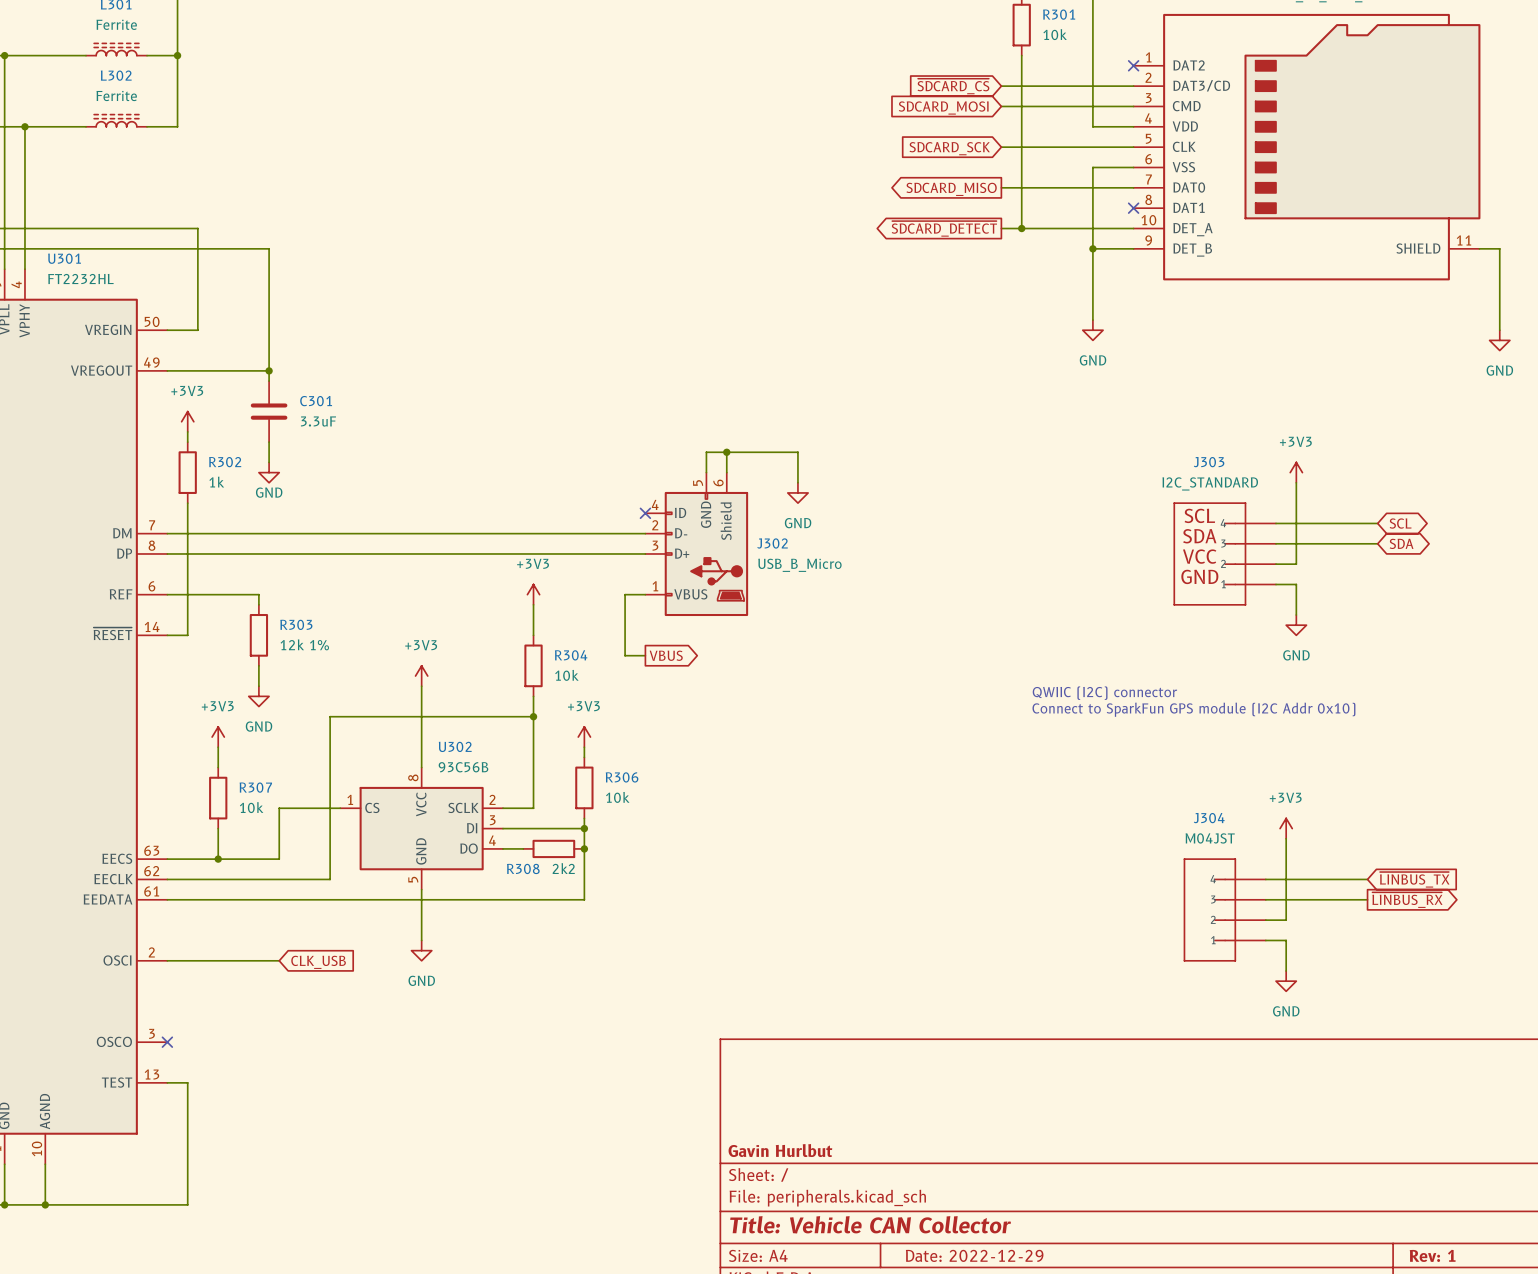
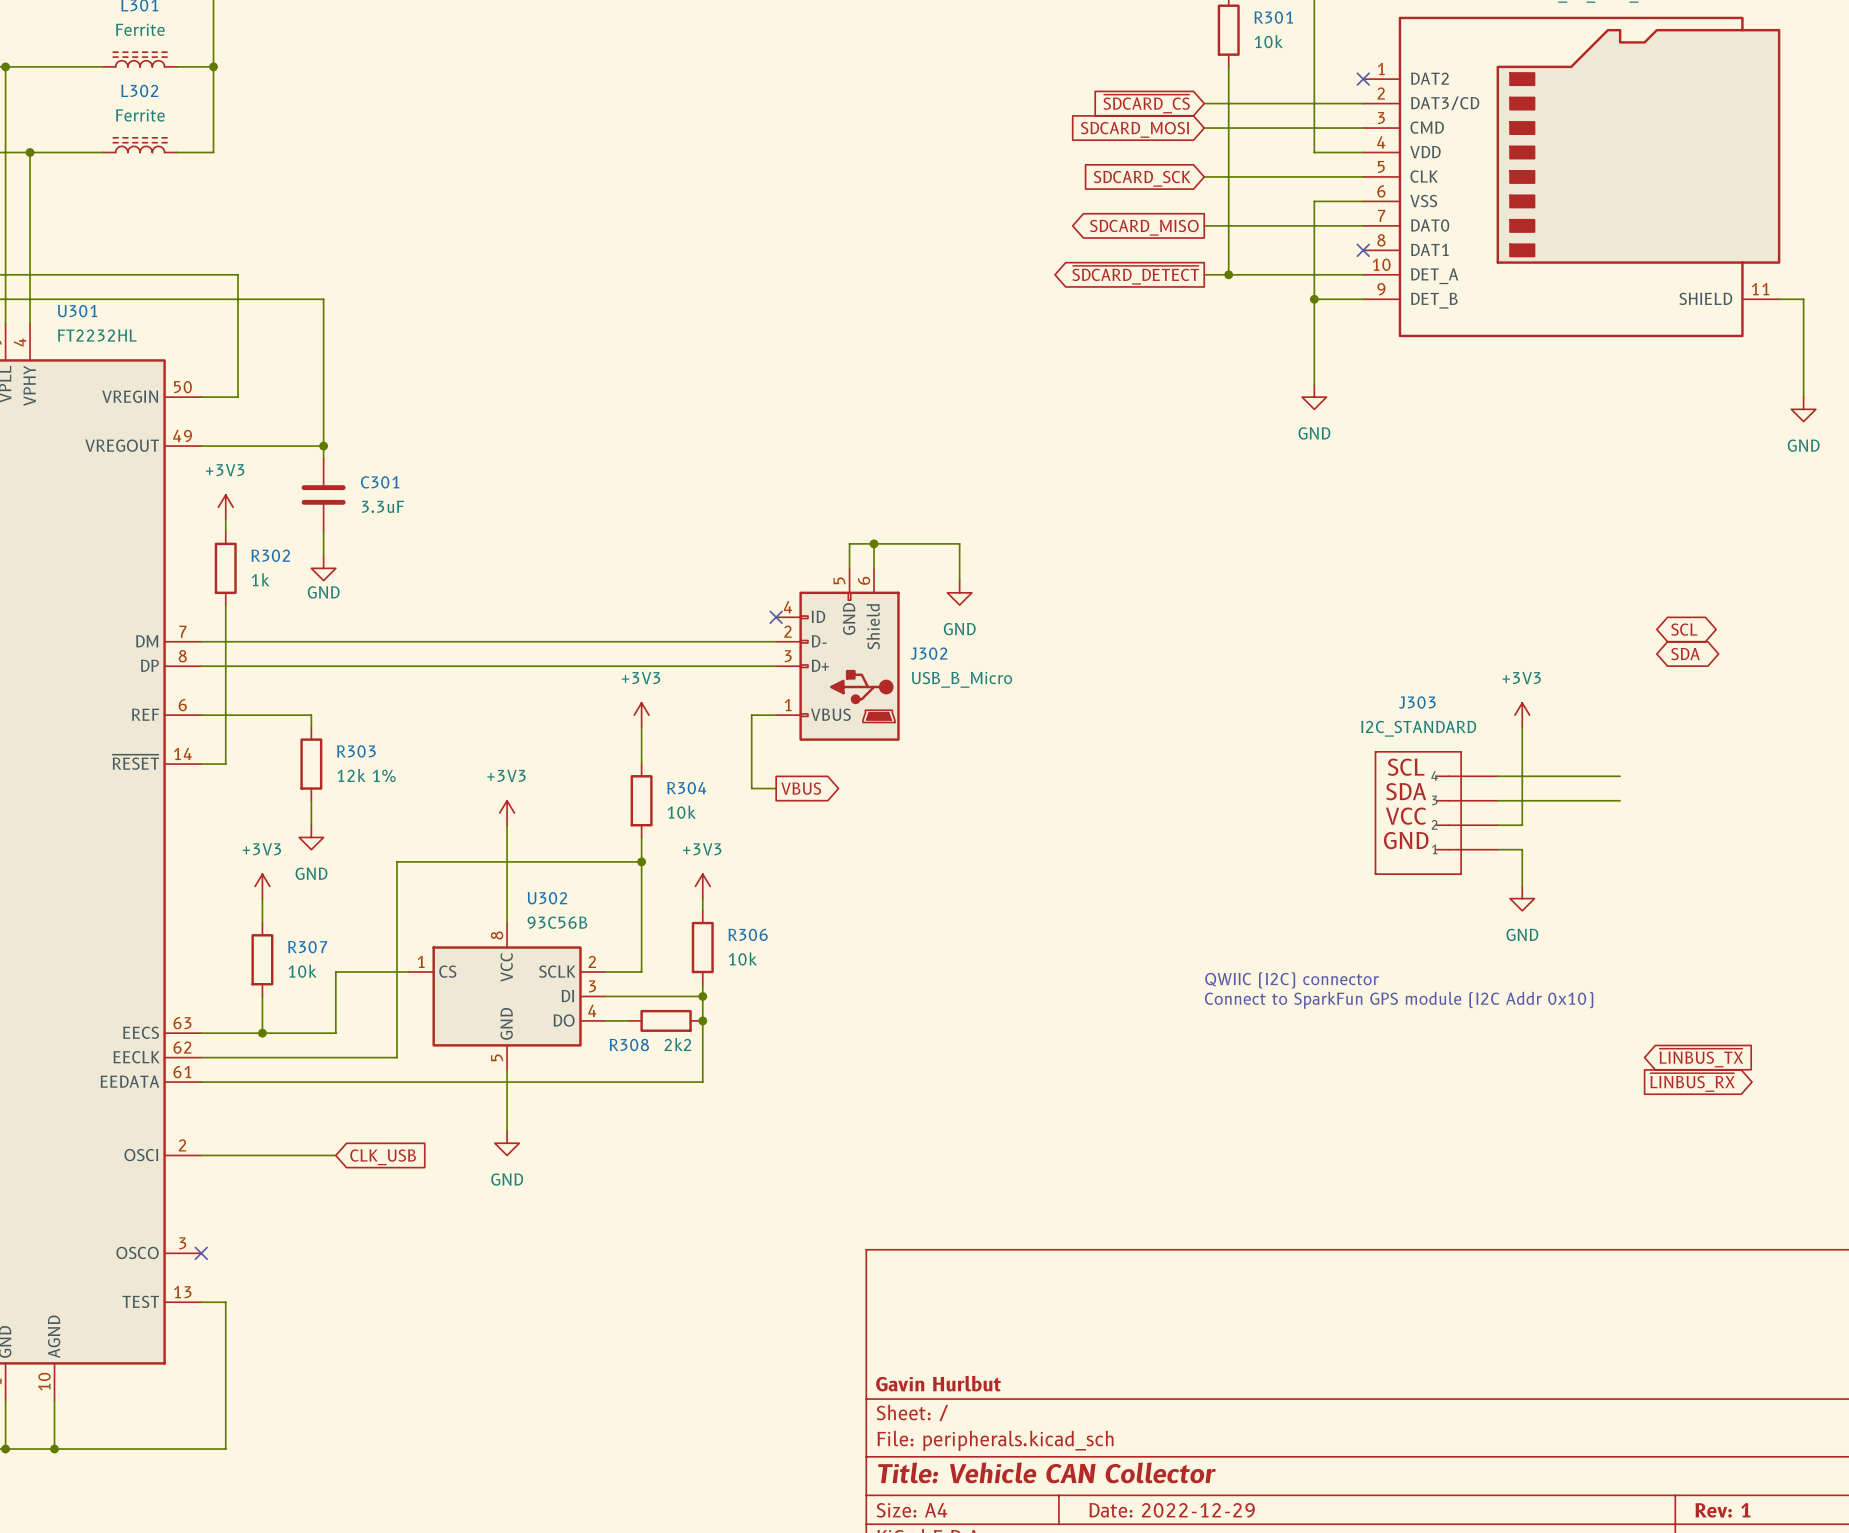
power symbol: +3V3 (1296, 472) -> none
wire: (1296, 482) (1296, 564) (1276, 564) -> (1522, 727) (1522, 825) (1497, 825)
wire: (1276, 523) (1377, 523) -> (1497, 776) (1620, 776)
wire: (1276, 543) (1377, 543) -> (1497, 800) (1620, 800)
J303 position: (1225, 553) -> (1436, 812)
wire: (1276, 584) (1296, 584) (1296, 615) -> (1497, 849) (1522, 849) (1522, 886)
power symbol: none -> +3V3 (1522, 715)
power symbol: GND (1296, 625) -> none
text position: QWIIC (I2C) connector (1104, 693) -> QWIIC (I2C) connector (1292, 980)
text position: Connect to SparkFun GPS module (I2C Addr 0x10) (1193, 709) -> Connect to SparkFun GPS module (I2C Addr 0x10) (1399, 1000)
power symbol: none -> GND (1522, 898)
power symbol: +3V3 (1286, 828) -> none
wire: (1286, 838) (1286, 920) (1265, 920) -> none
wire: (1265, 879) (1367, 879) -> none
wire: (1265, 899) (1367, 899) -> none
J304: M04JST (1225, 909) -> none
wire: (1265, 940) (1286, 940) (1286, 970) -> none
power symbol: GND (1286, 981) -> none

